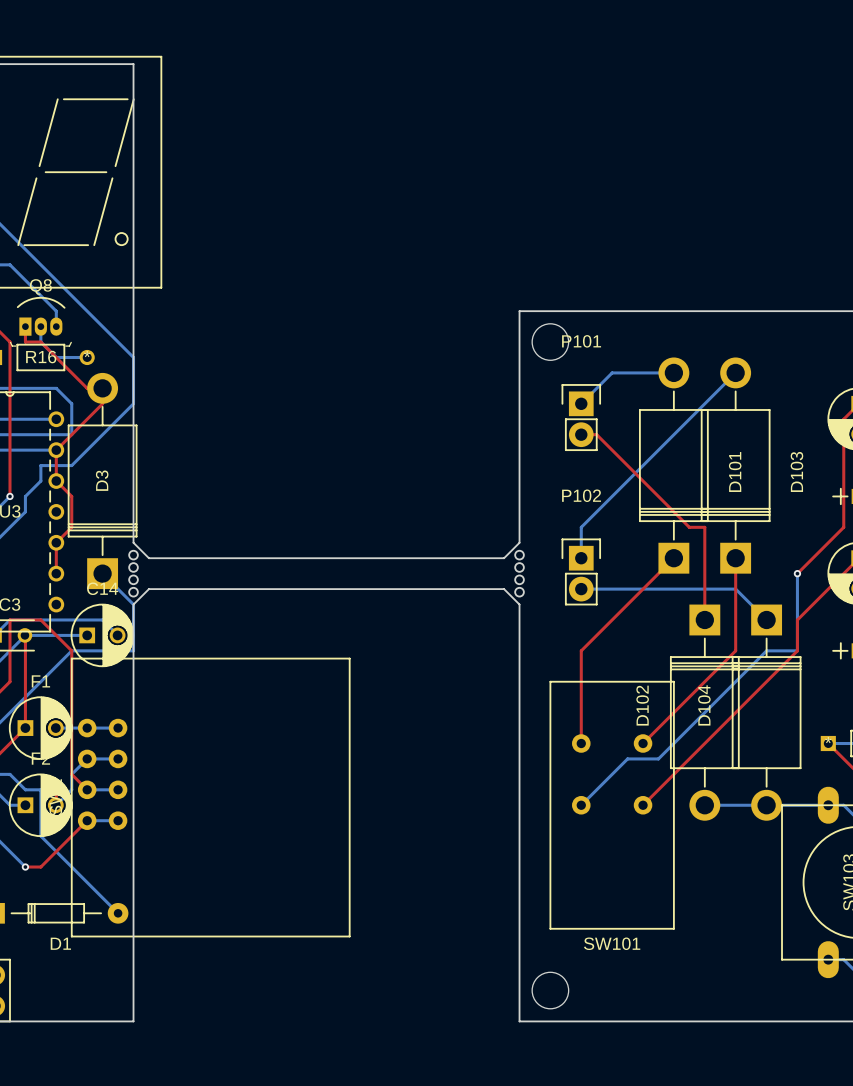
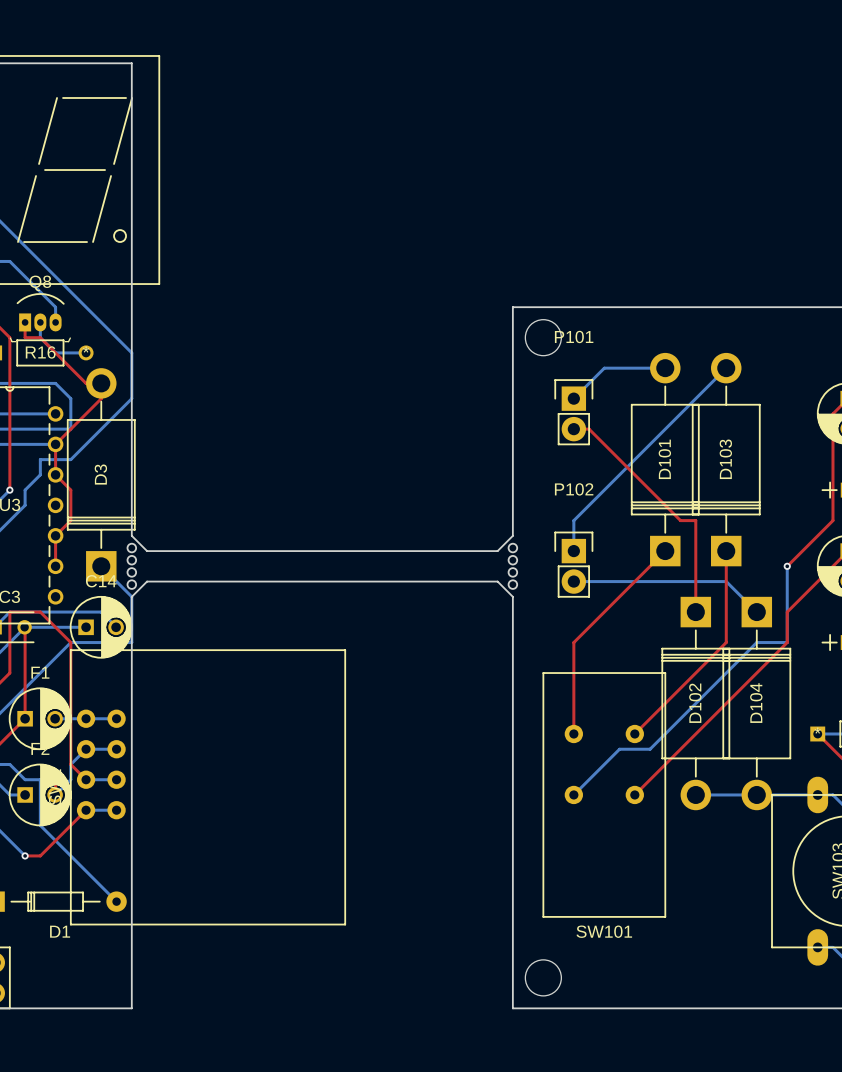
D103 name position: D103 (796, 471) -> D103 (725, 459)
D101 name position: D101 (735, 472) -> D101 (664, 459)
D102 name position: D102 (642, 705) -> D102 (695, 703)
D104 name position: D104 (704, 705) -> D104 (756, 703)

